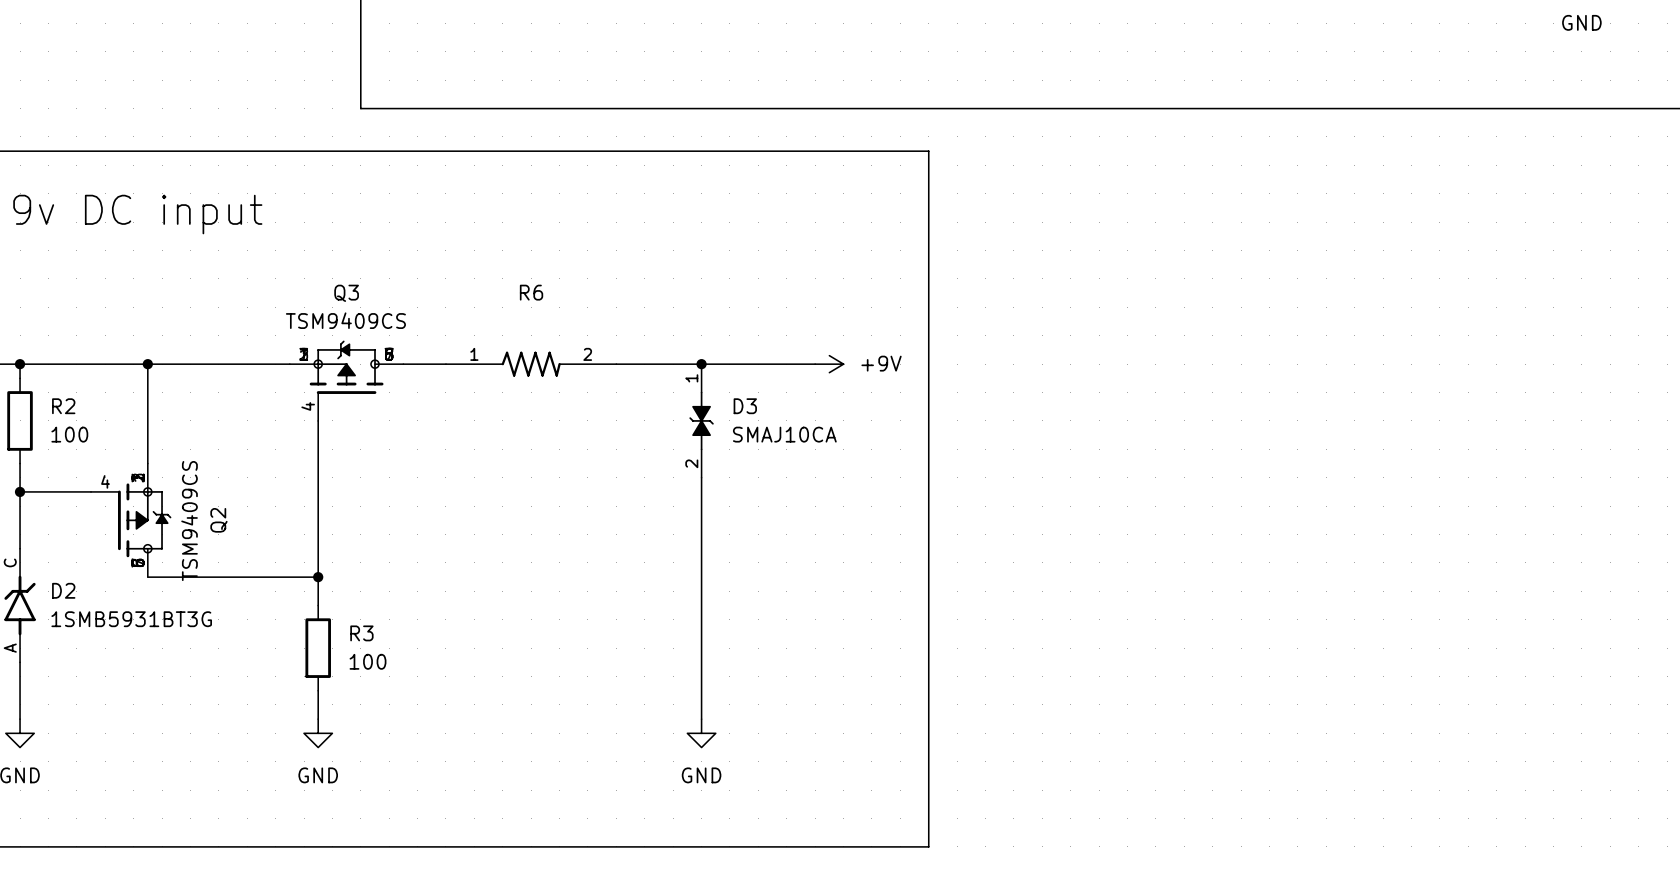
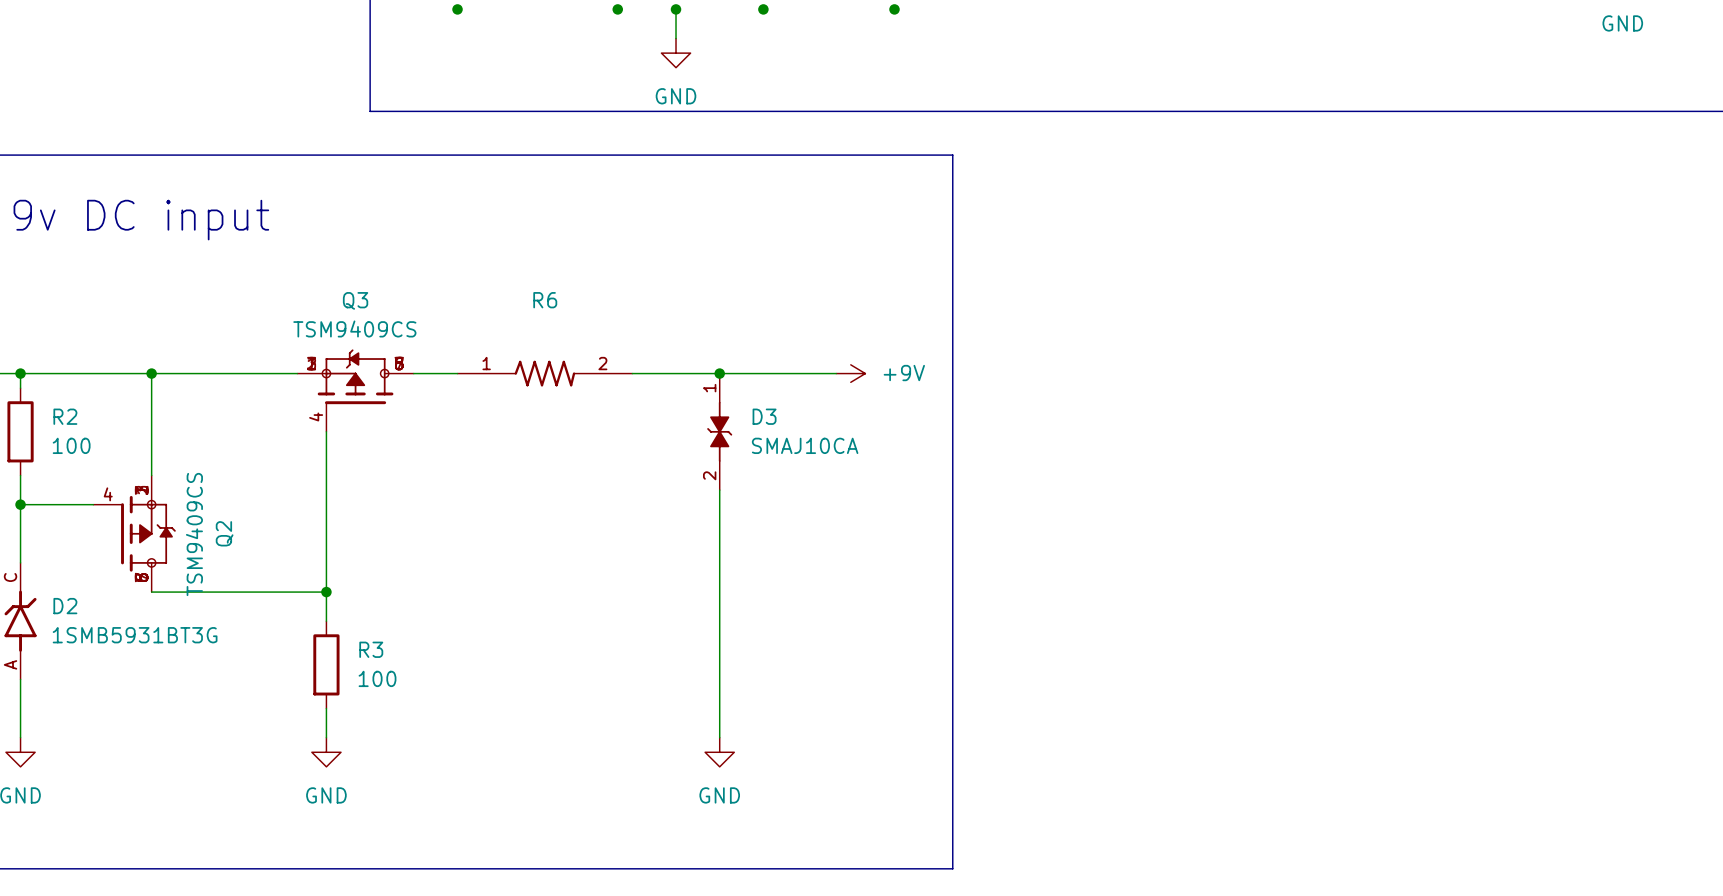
junction: none -> (457, 9)
junction: none -> (617, 9)
wire: none -> (676, 9) (676, 38)
junction: none -> (676, 9)
junction: none -> (763, 9)
junction: none -> (894, 9)
power symbol: none -> GND (676, 53)

